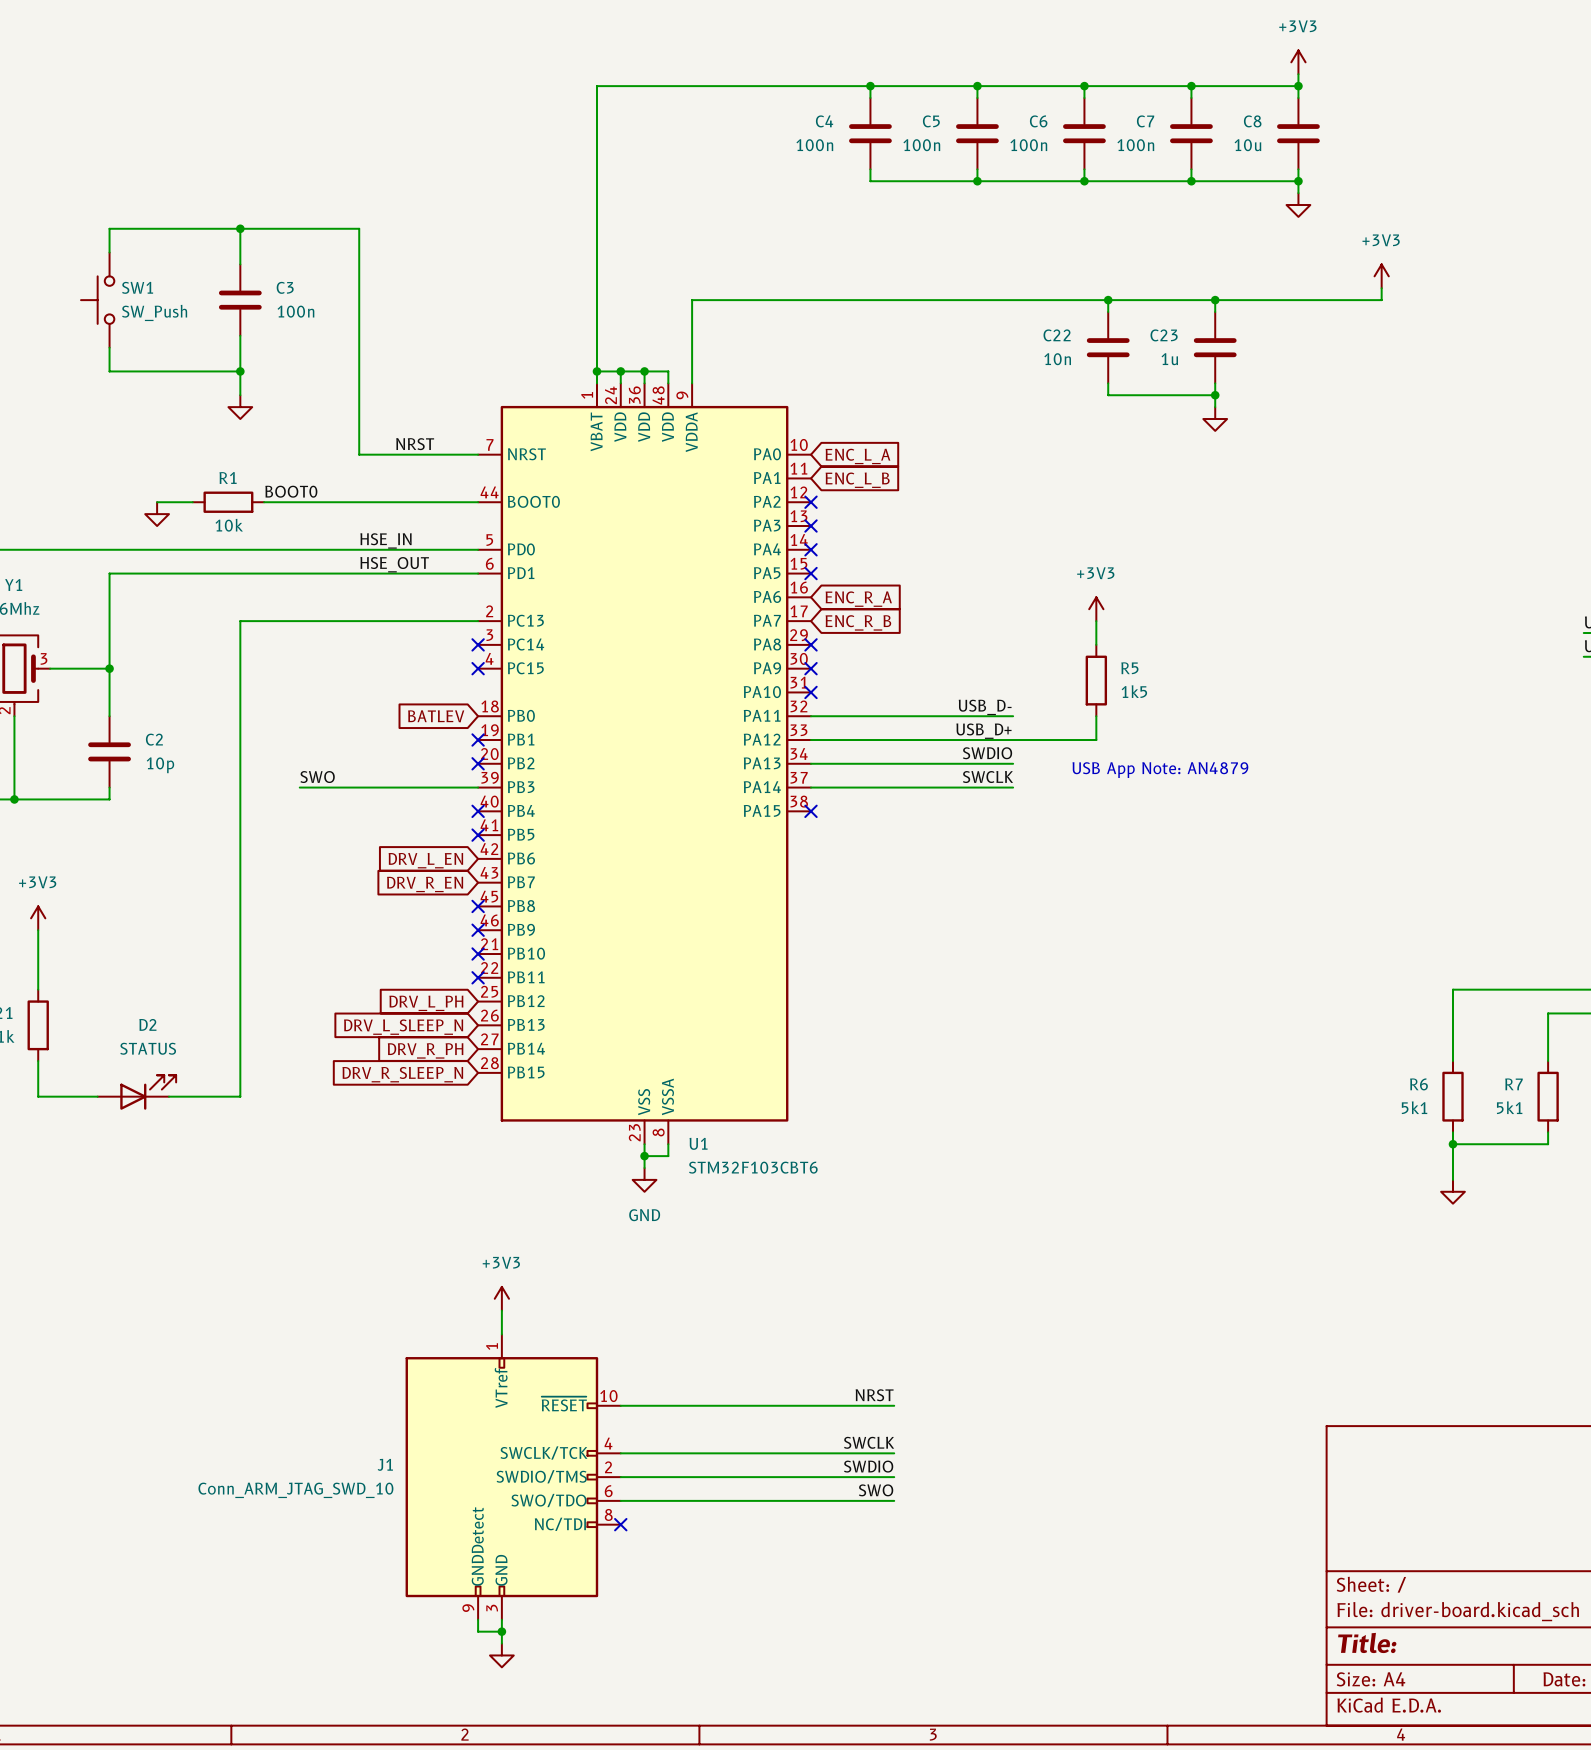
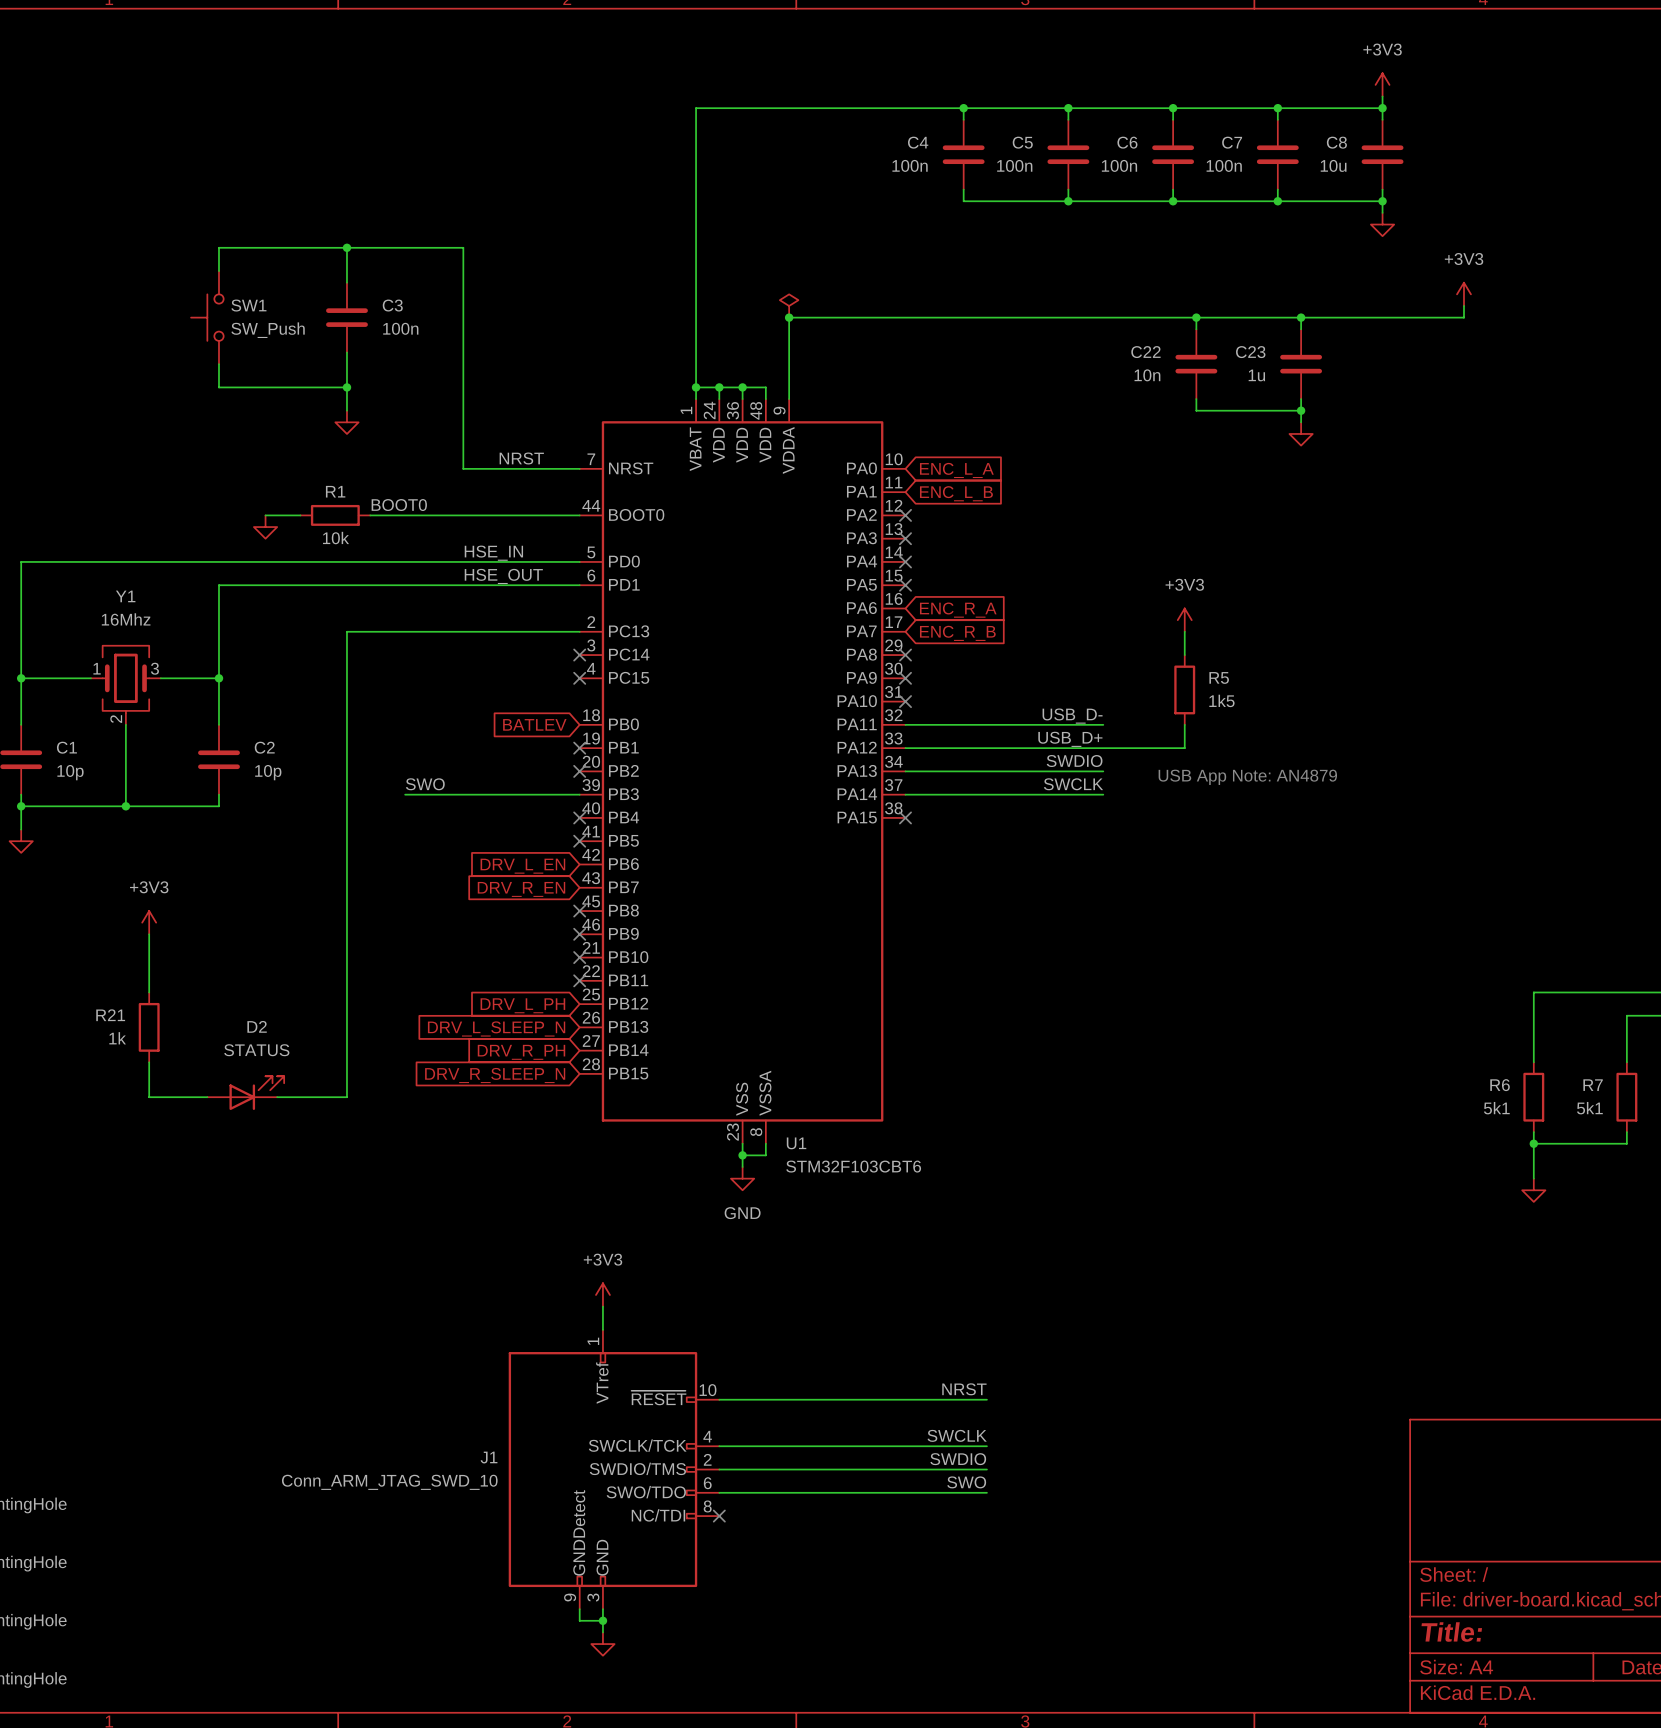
power symbol: none -> (789, 305)
junction: none -> (789, 317)

